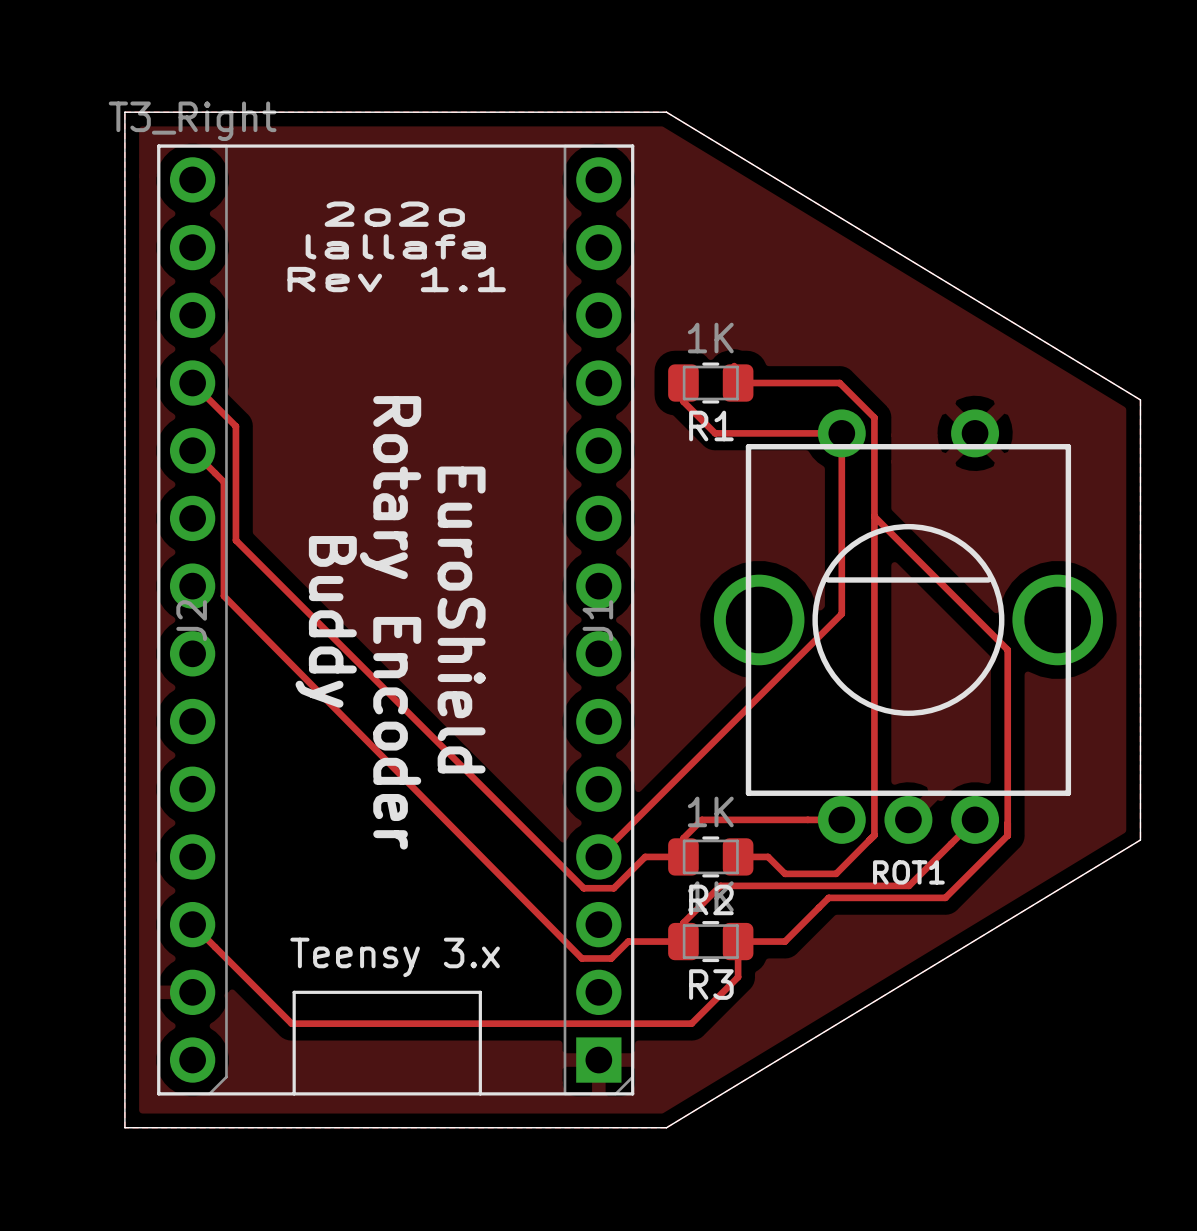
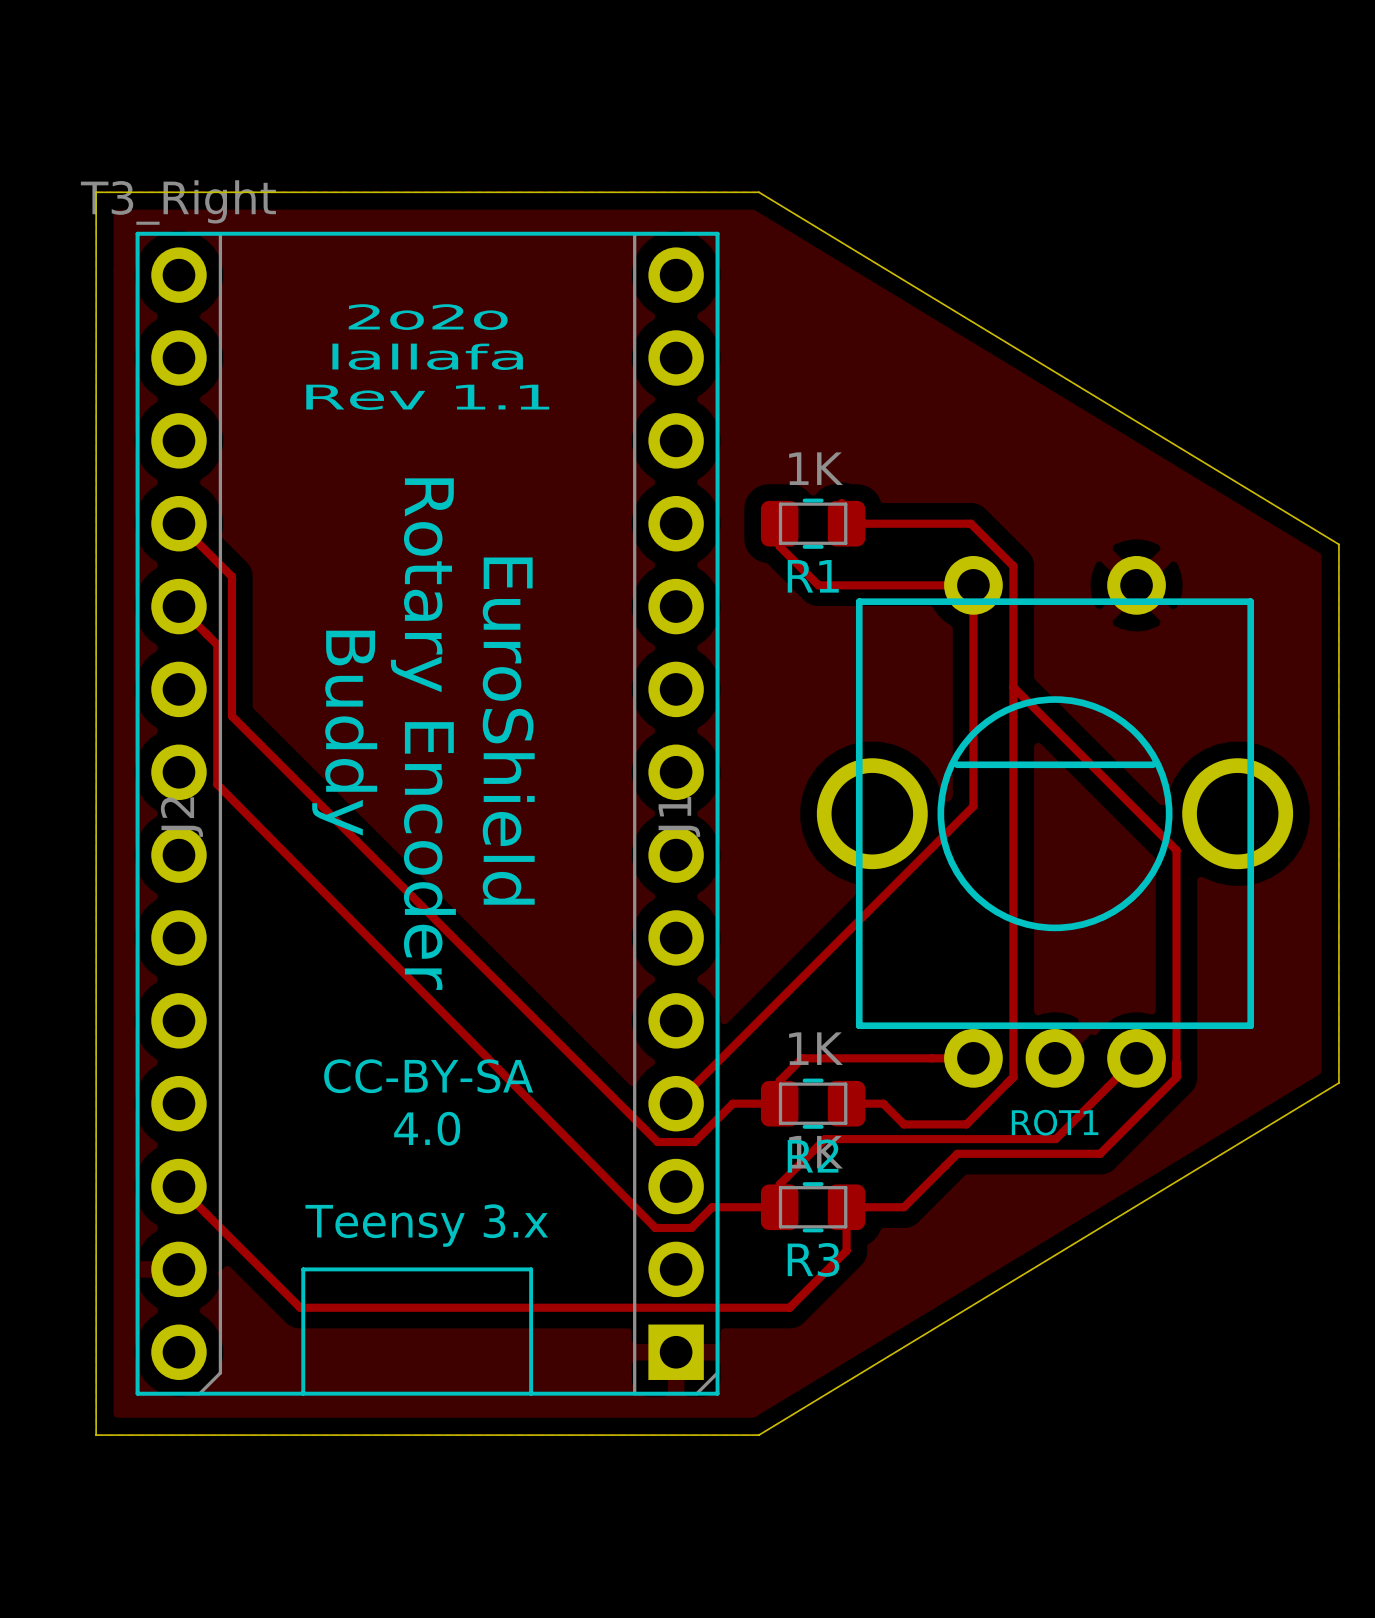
text position: EuroShield (461, 619) -> EuroShield (508, 731)
text position: Buddy (326, 621) -> Buddy (344, 733)
text position: Rotary Encoder (390, 622) -> Rotary Encoder (423, 734)
text: none -> CC-BY-SA (428, 1076)
text: none -> 4.0 (427, 1128)

